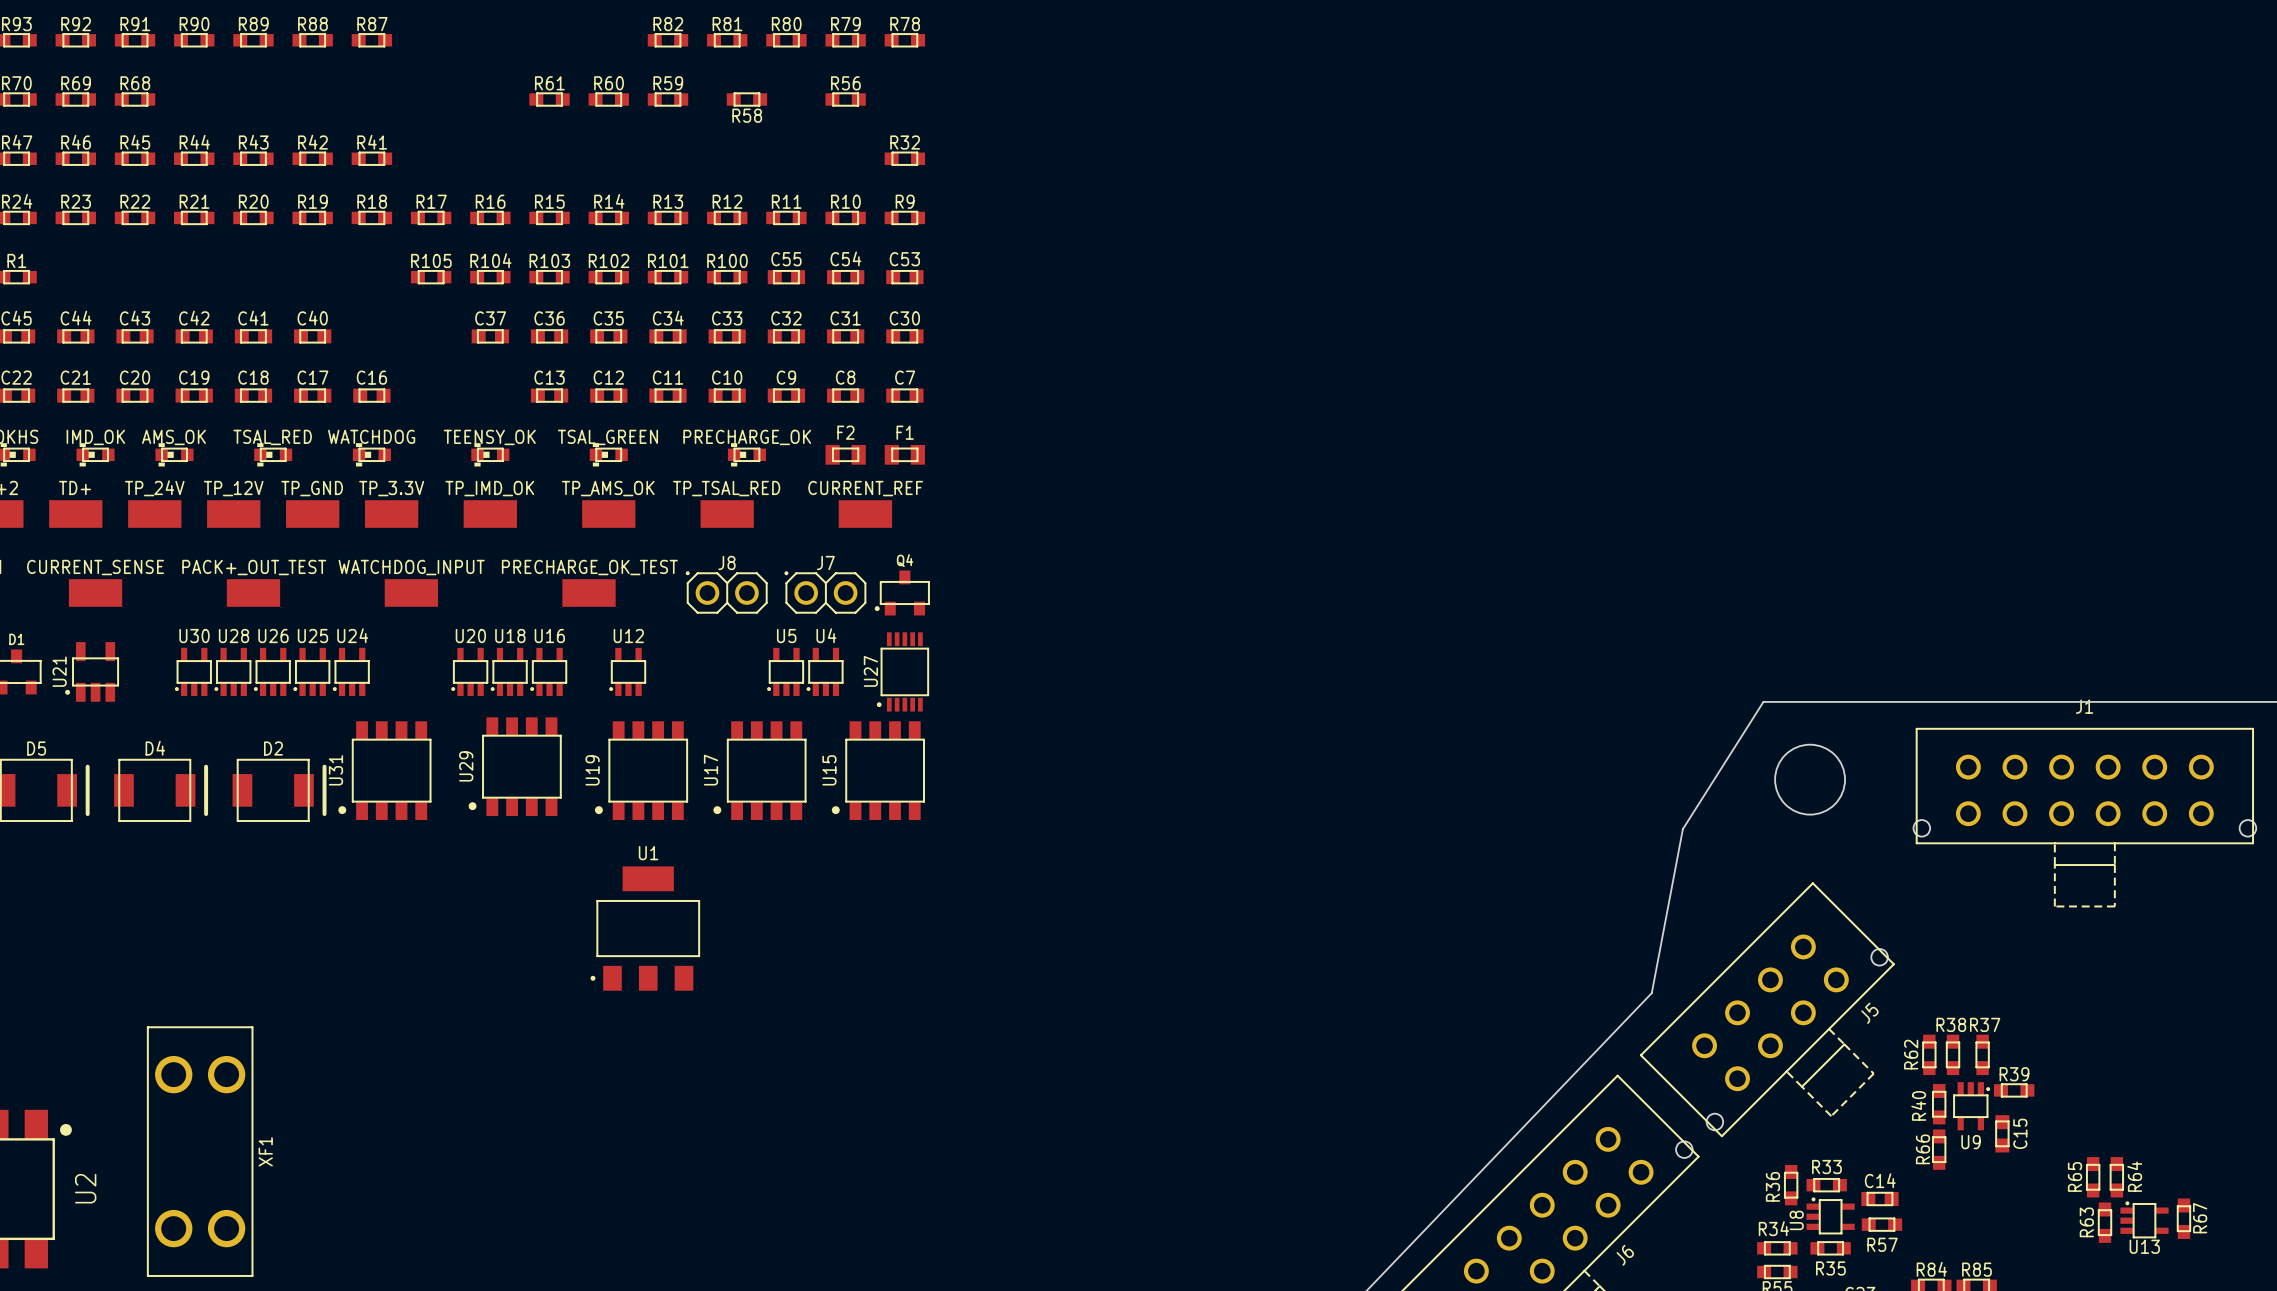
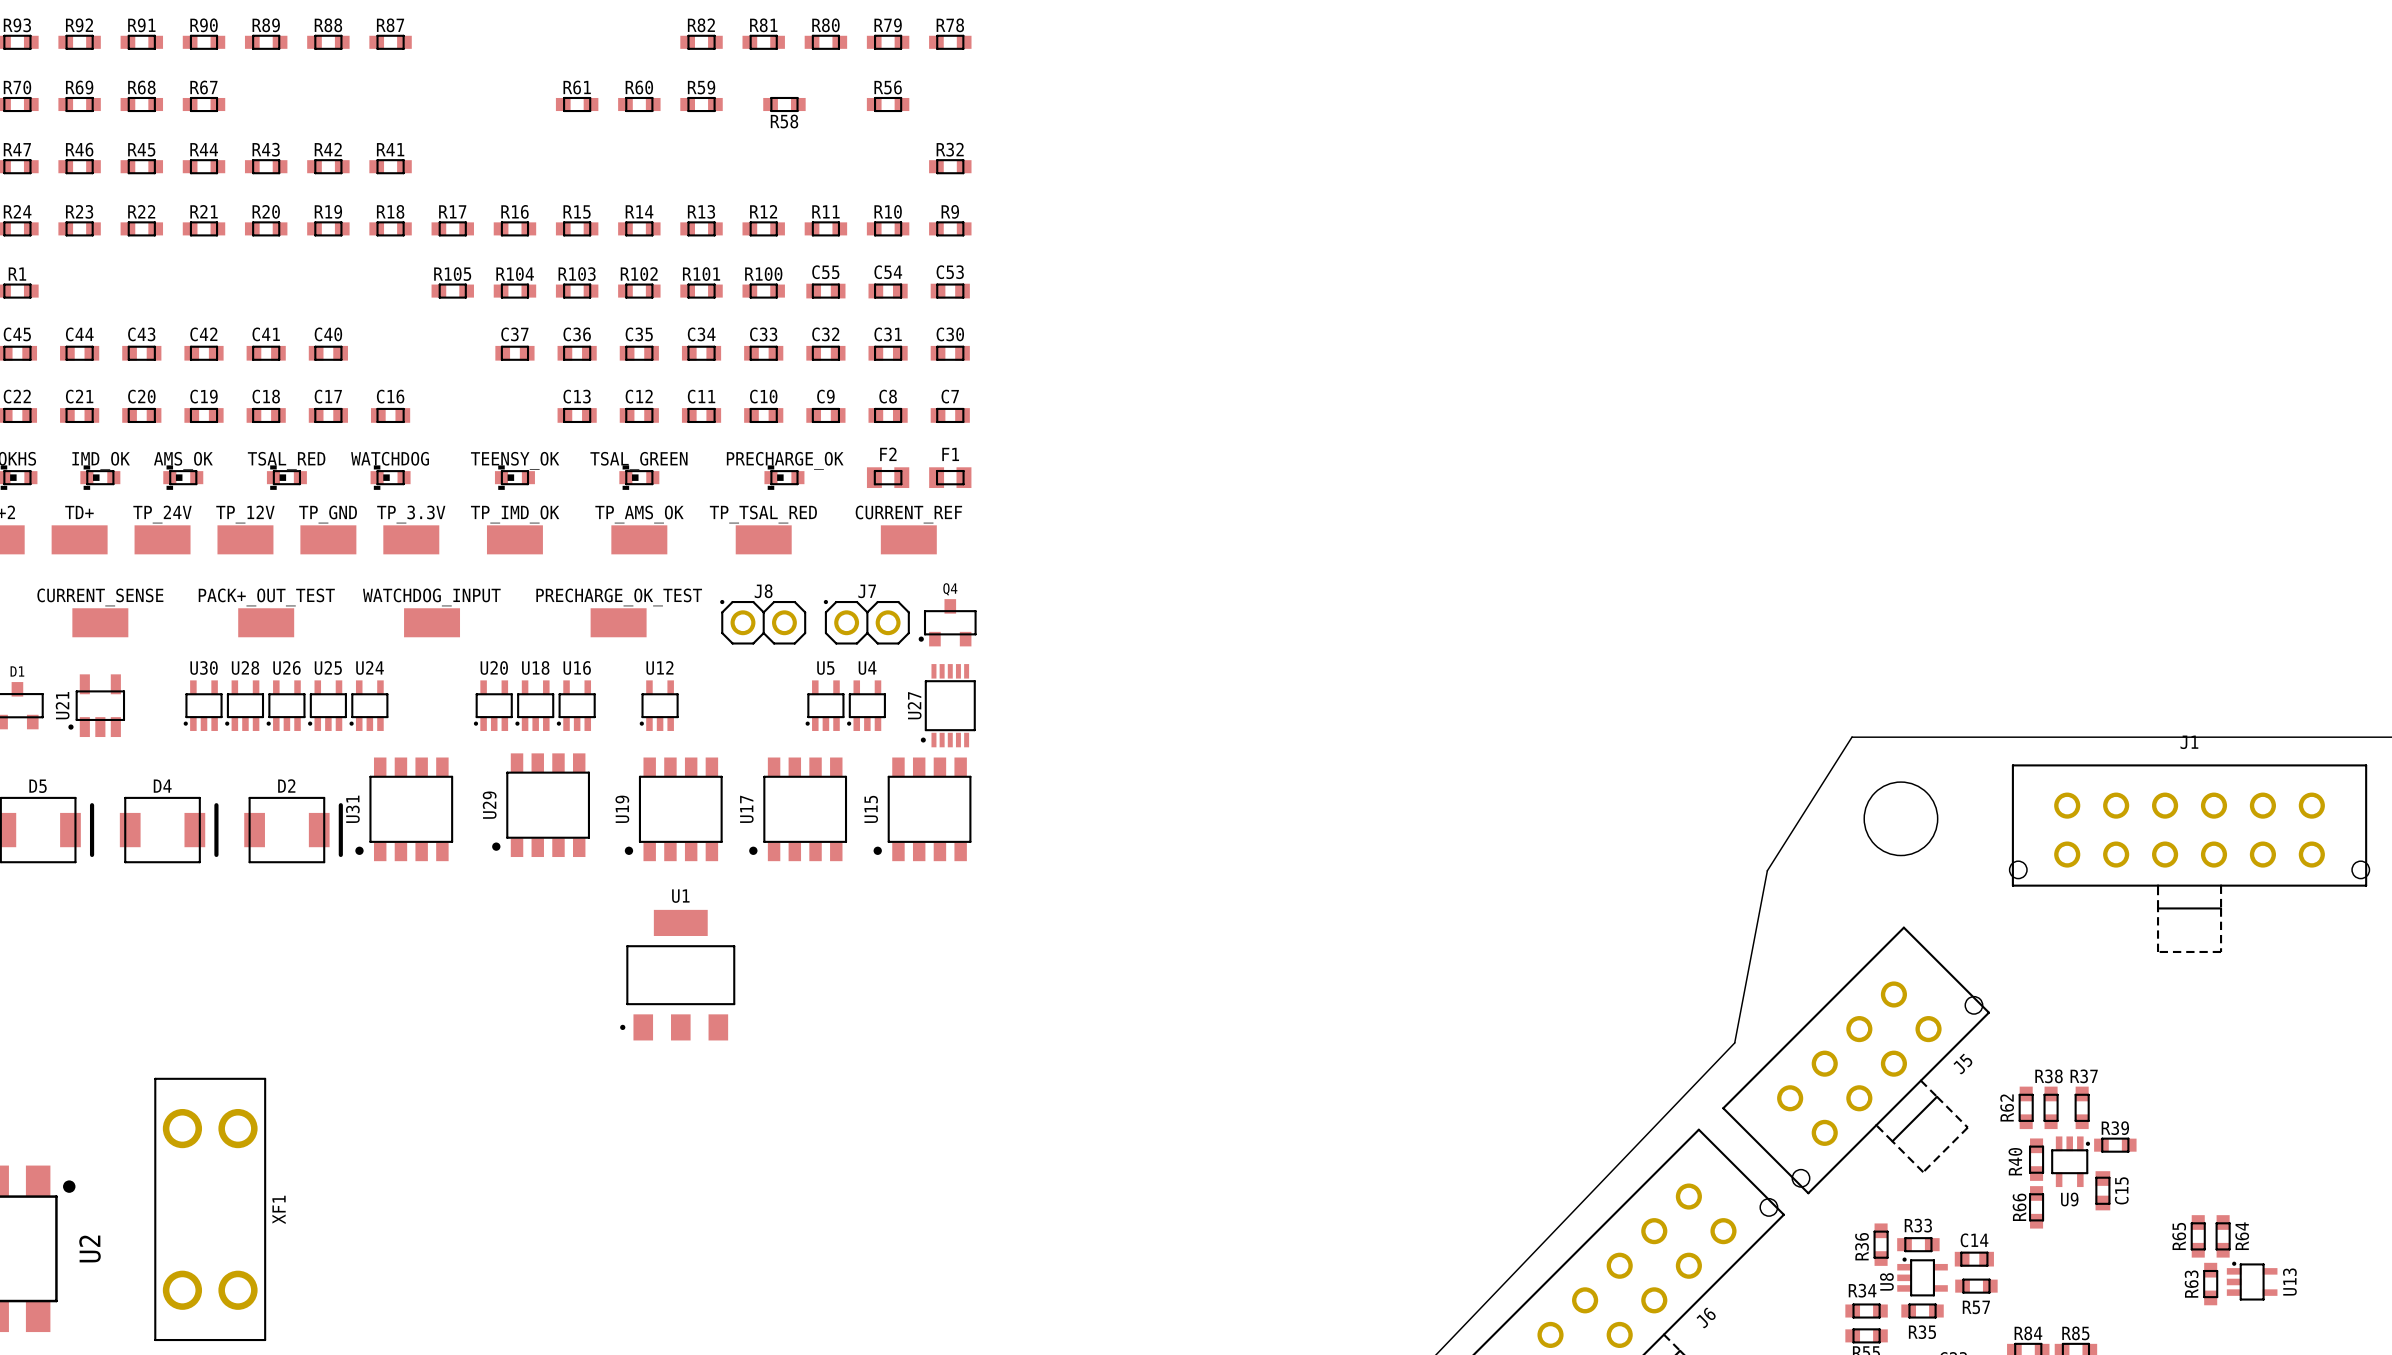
R67 rotation: 0° (2183, 1218) -> 90° clockwise (204, 104)
R67 position: (2183, 1218) -> (204, 104)
U13 name rotation: 0° (2144, 1246) -> 90° counterclockwise (2289, 1282)
U13 name position: U13 (2144, 1246) -> U13 (2289, 1282)

